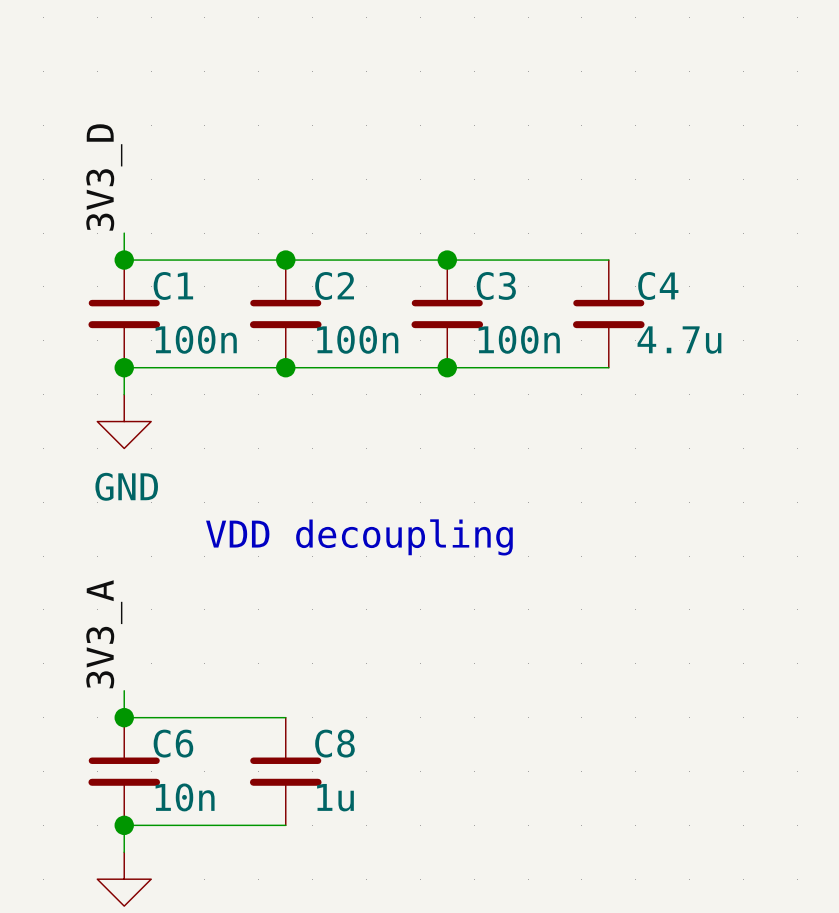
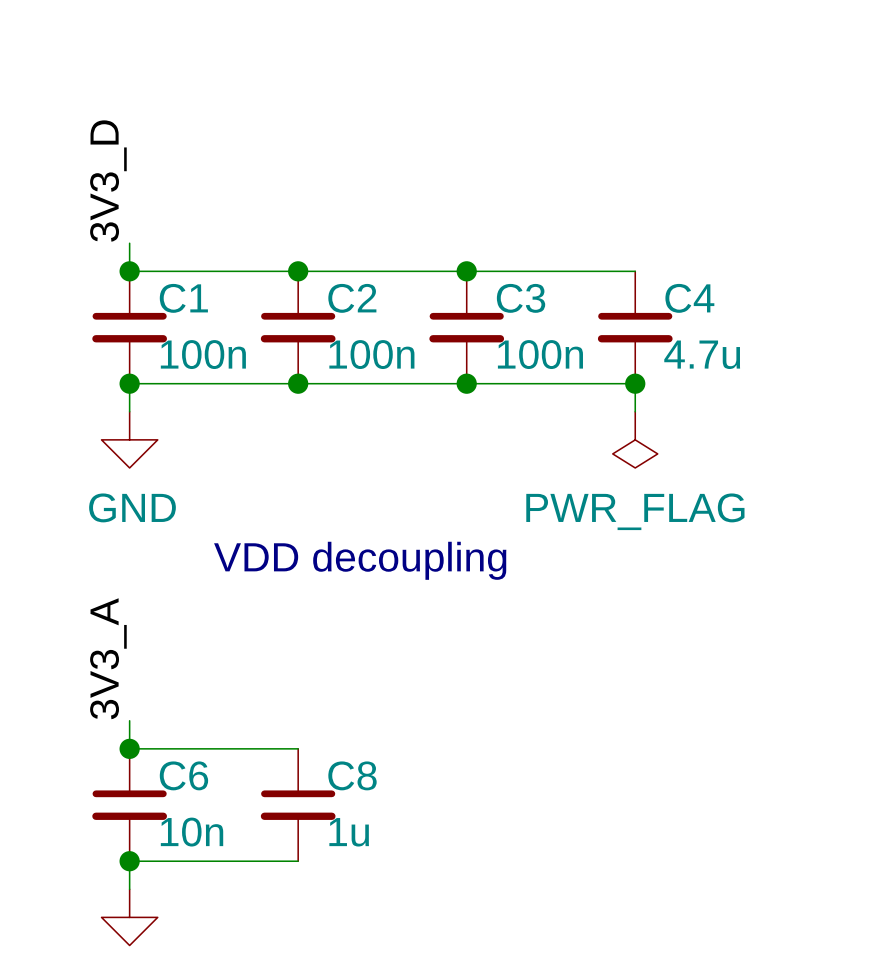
wire: none -> (635, 383) (635, 411)
junction: none -> (635, 383)
power symbol: none -> PWR_FLAG (635, 439)

